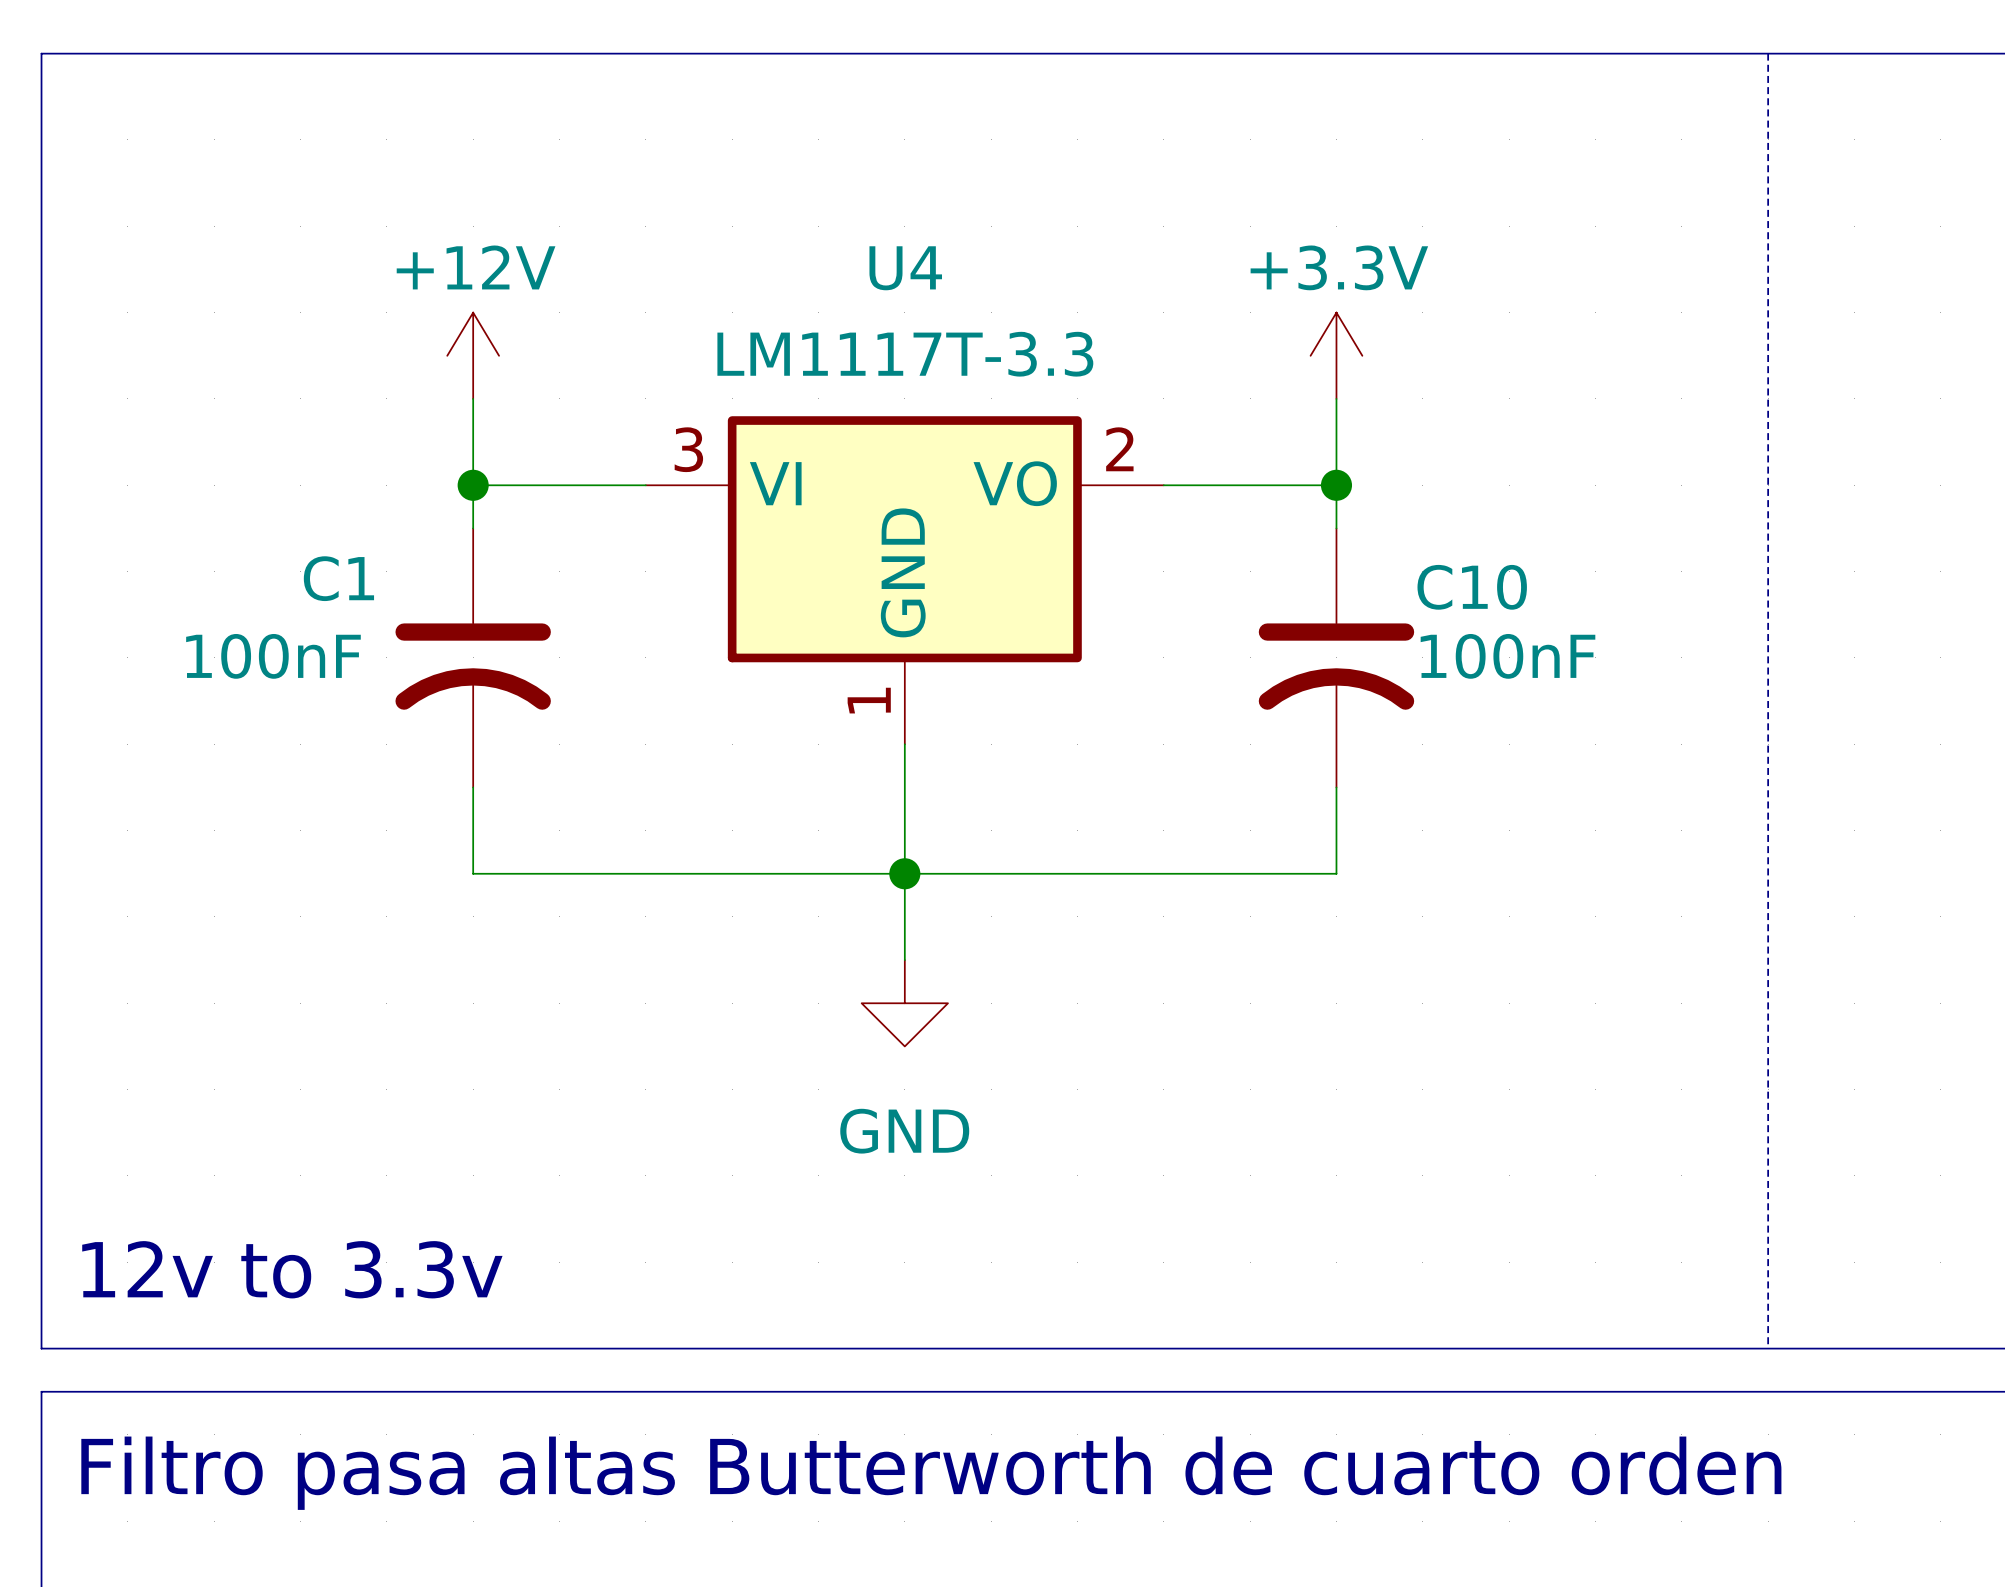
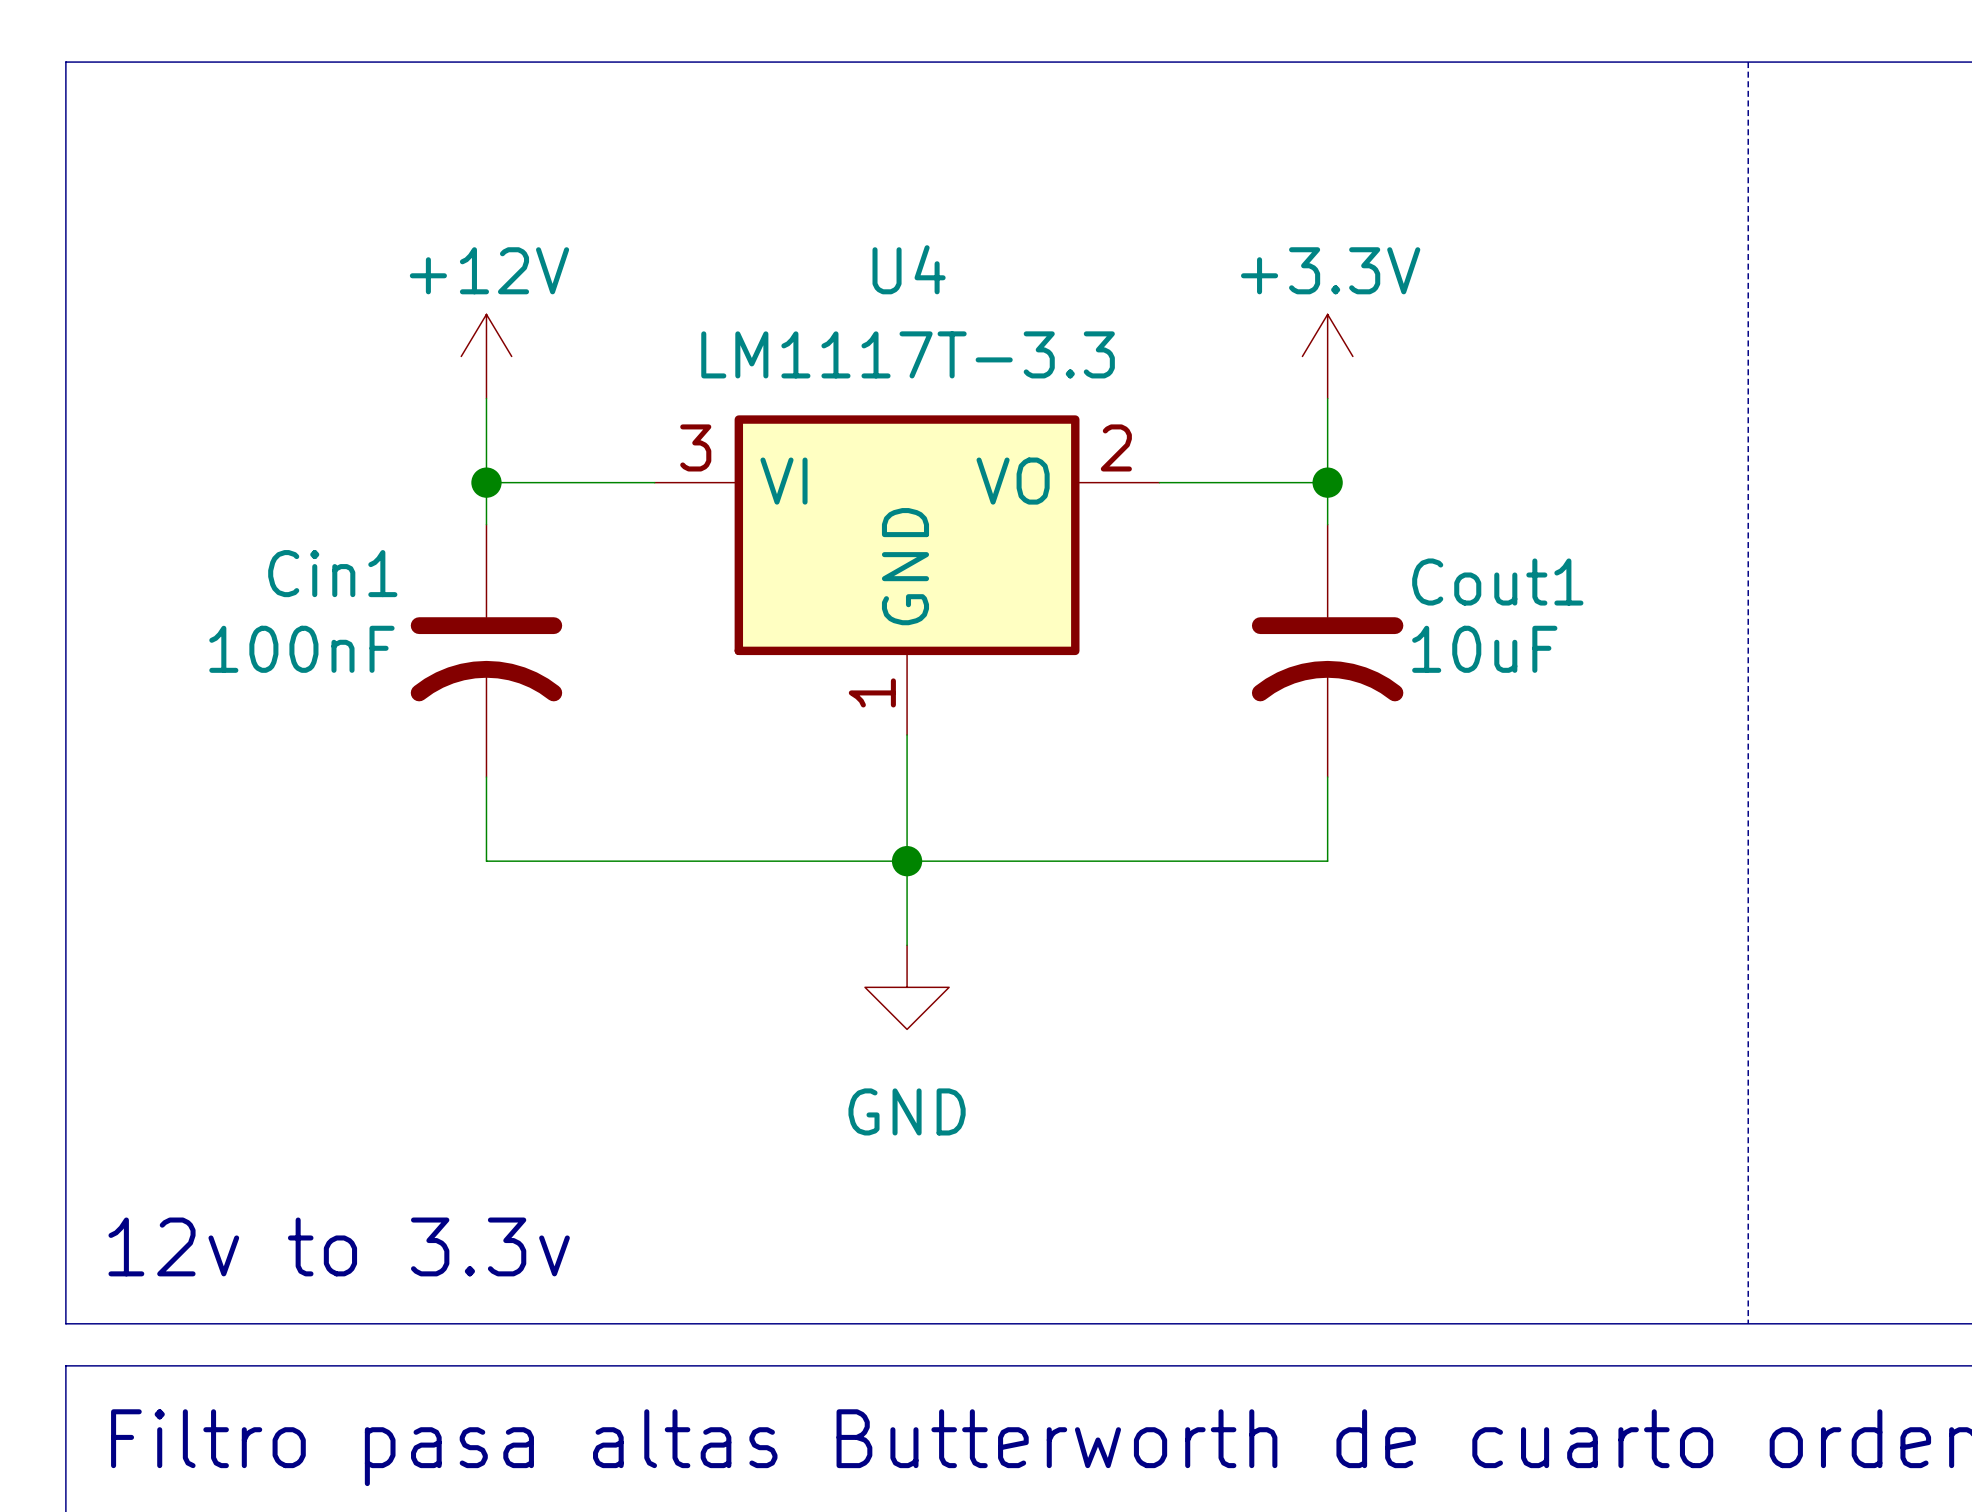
C1 name: C1 (338, 578) -> Cin1 (332, 573)
C10 name: C10 (1472, 587) -> Cout1 (1497, 582)
C10 value: 100nF (1507, 656) -> 10uF (1484, 649)

